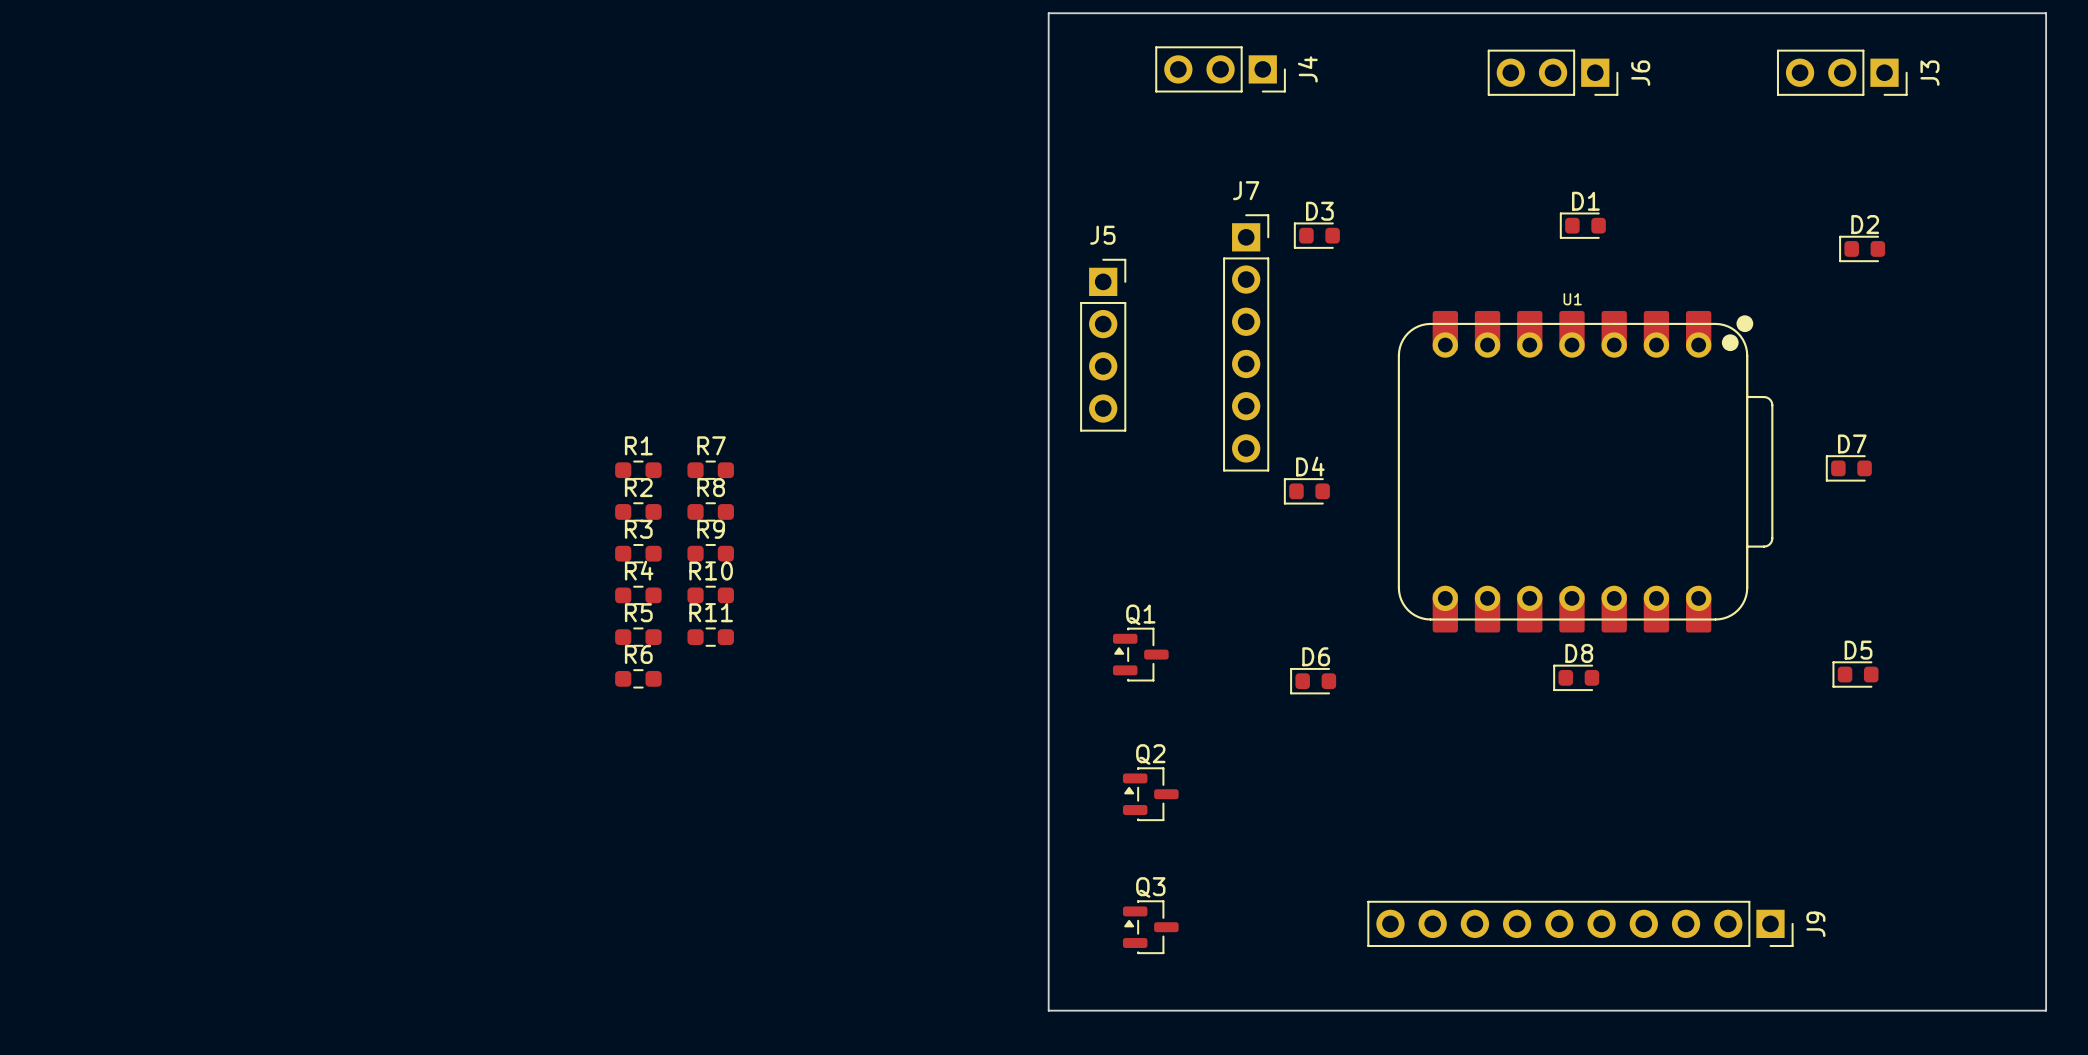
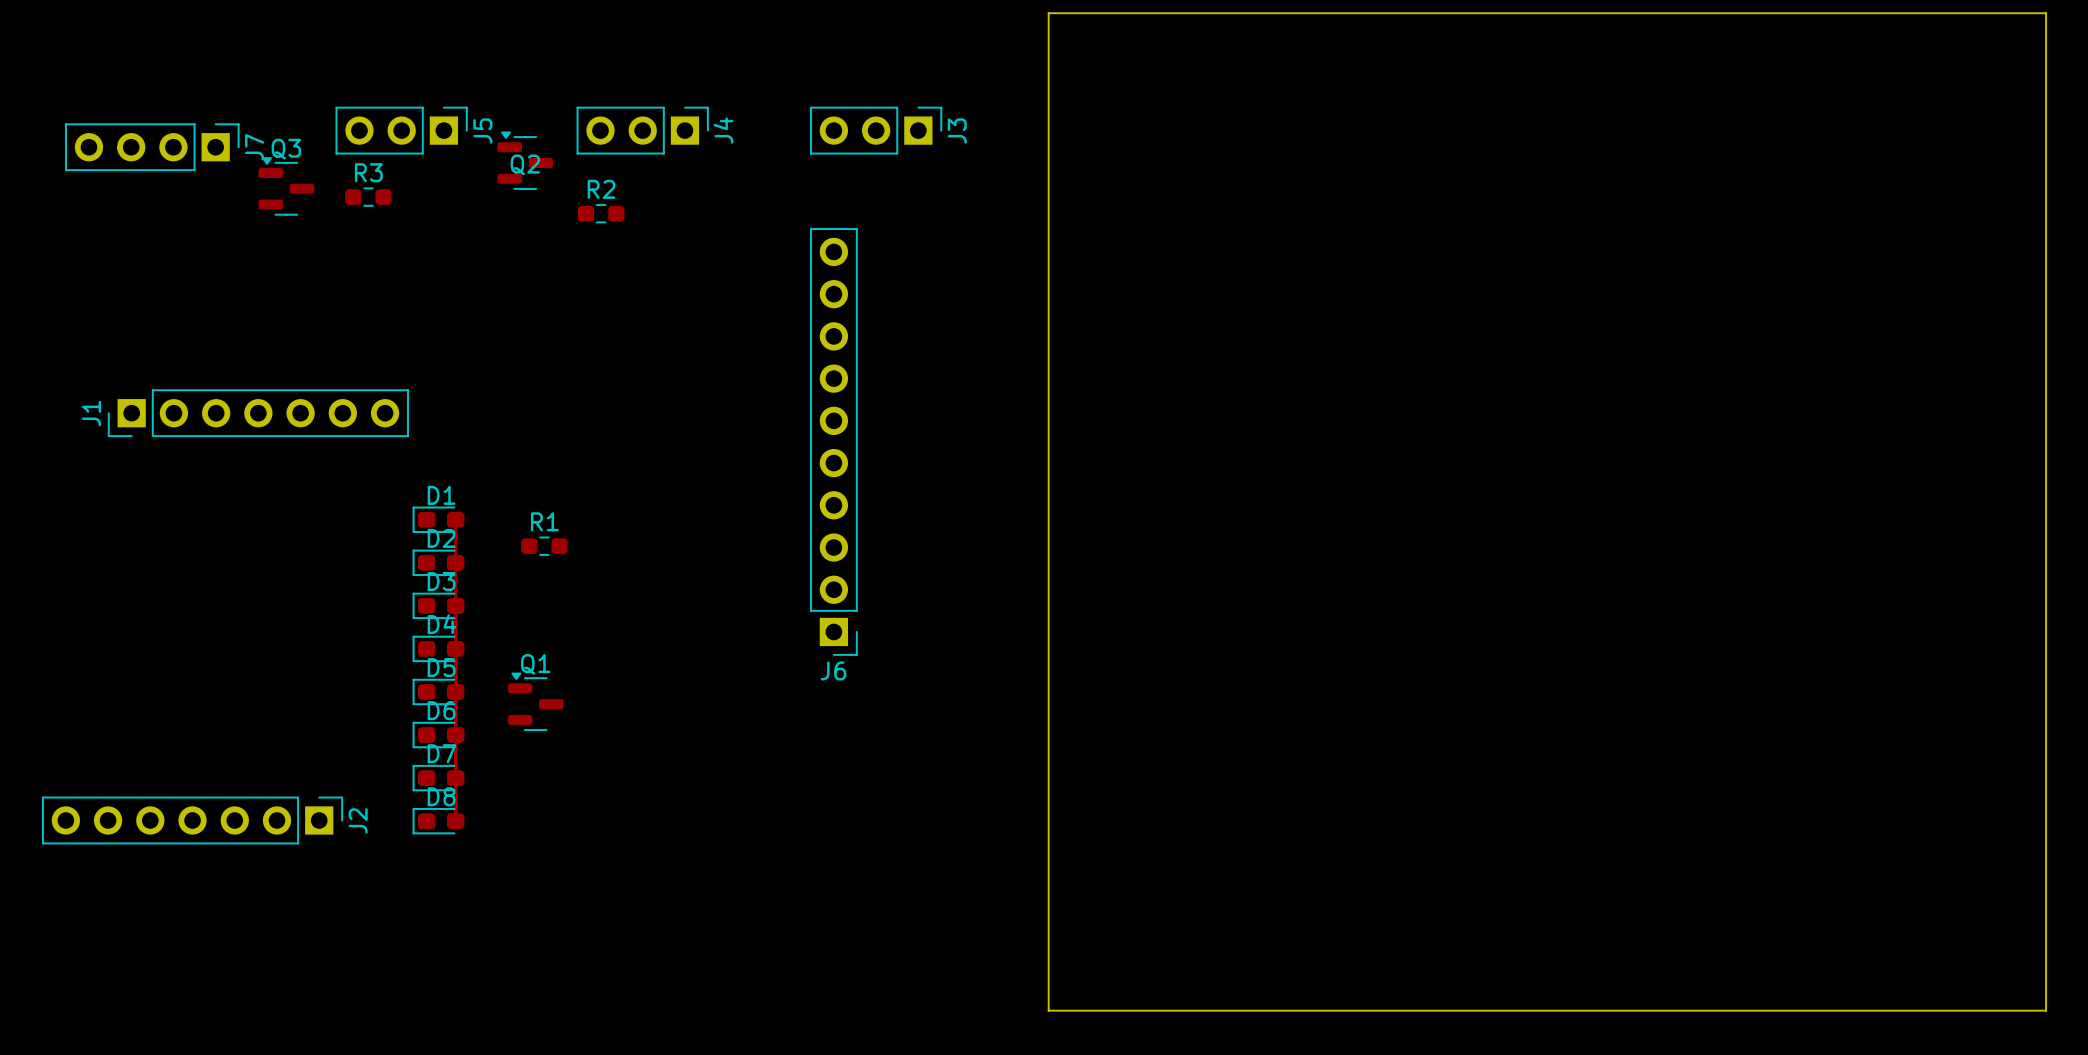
J4 footprint: [1155, 46, 1286, 93] -> [576, 106, 709, 155]
J6 footprint: [1487, 49, 1619, 96] -> [809, 228, 858, 656]
J3 footprint: [1776, 49, 1908, 96] -> [809, 106, 943, 155]
J6 name position: J6 (1640, 73) -> J6 (833, 670)
J7 name position: J7 (1246, 190) -> J7 (254, 147)
D1 footprint: [1559, 212, 1606, 239] -> [412, 506, 465, 533]
J7 footprint: [1223, 214, 1270, 472] -> [65, 123, 240, 172]
D3 footprint: [1293, 222, 1340, 249] -> [412, 592, 465, 620]
J5 name position: J5 (1102, 235) -> J5 (482, 130)
D2 footprint: [1839, 235, 1886, 263] -> [412, 549, 465, 577]
J5 footprint: [1080, 258, 1127, 432] -> [335, 106, 468, 155]
J1: none -> (258, 413)
D7 footprint: [1825, 455, 1872, 482] -> [412, 764, 465, 792]
R1 position: (638, 470) -> (544, 546)
R7: (710, 470) -> none
U1: (1585, 471) -> none
D4 footprint: [1283, 478, 1330, 505] -> [412, 635, 465, 663]
R2 position: (638, 511) -> (601, 213)
R8: (710, 511) -> none
track: none -> (455, 519) (455, 821)
R3 position: (638, 553) -> (368, 197)
R9: (710, 553) -> none
R4: (638, 595) -> none
R10: (710, 595) -> none
Q1 footprint: [1112, 627, 1169, 682] -> [507, 672, 564, 732]
R5: (638, 637) -> none
R11: (710, 637) -> none
D5 footprint: [1832, 661, 1879, 688] -> [412, 678, 465, 706]
D8 footprint: [1553, 664, 1600, 692] -> [412, 807, 465, 835]
D6 footprint: [1290, 667, 1337, 695] -> [412, 721, 465, 749]
R6: (638, 678) -> none
Q2 name position: Q2 (1150, 754) -> Q2 (525, 164)
Q2 footprint: [1122, 767, 1179, 822] -> [497, 131, 554, 190]
J2: none -> (192, 820)
Q3 footprint: [1122, 900, 1179, 955] -> [258, 157, 315, 216]
J9: (1580, 923) -> none

